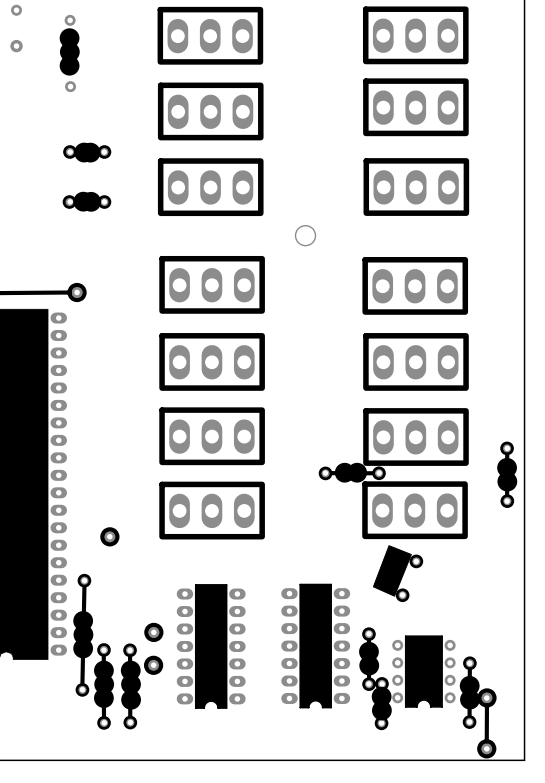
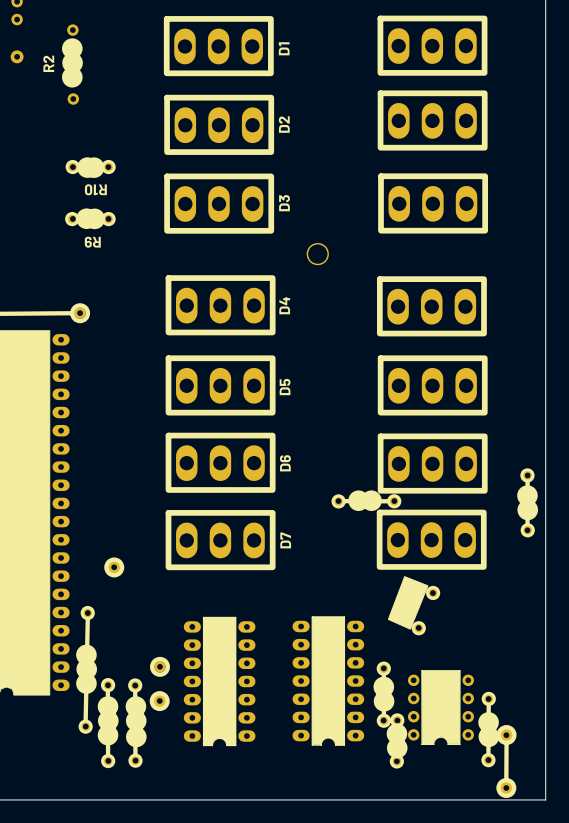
text: none -> D1 (284, 48)
text: none -> R2 (48, 63)
text: none -> D2 (284, 124)
text: none -> R10 (95, 189)
text: none -> D3 (284, 203)
text: none -> R9 (92, 242)
text: none -> D4 (284, 305)
text: none -> D5 (285, 387)
text: none -> D6 (285, 463)
text: none -> D7 (285, 540)

